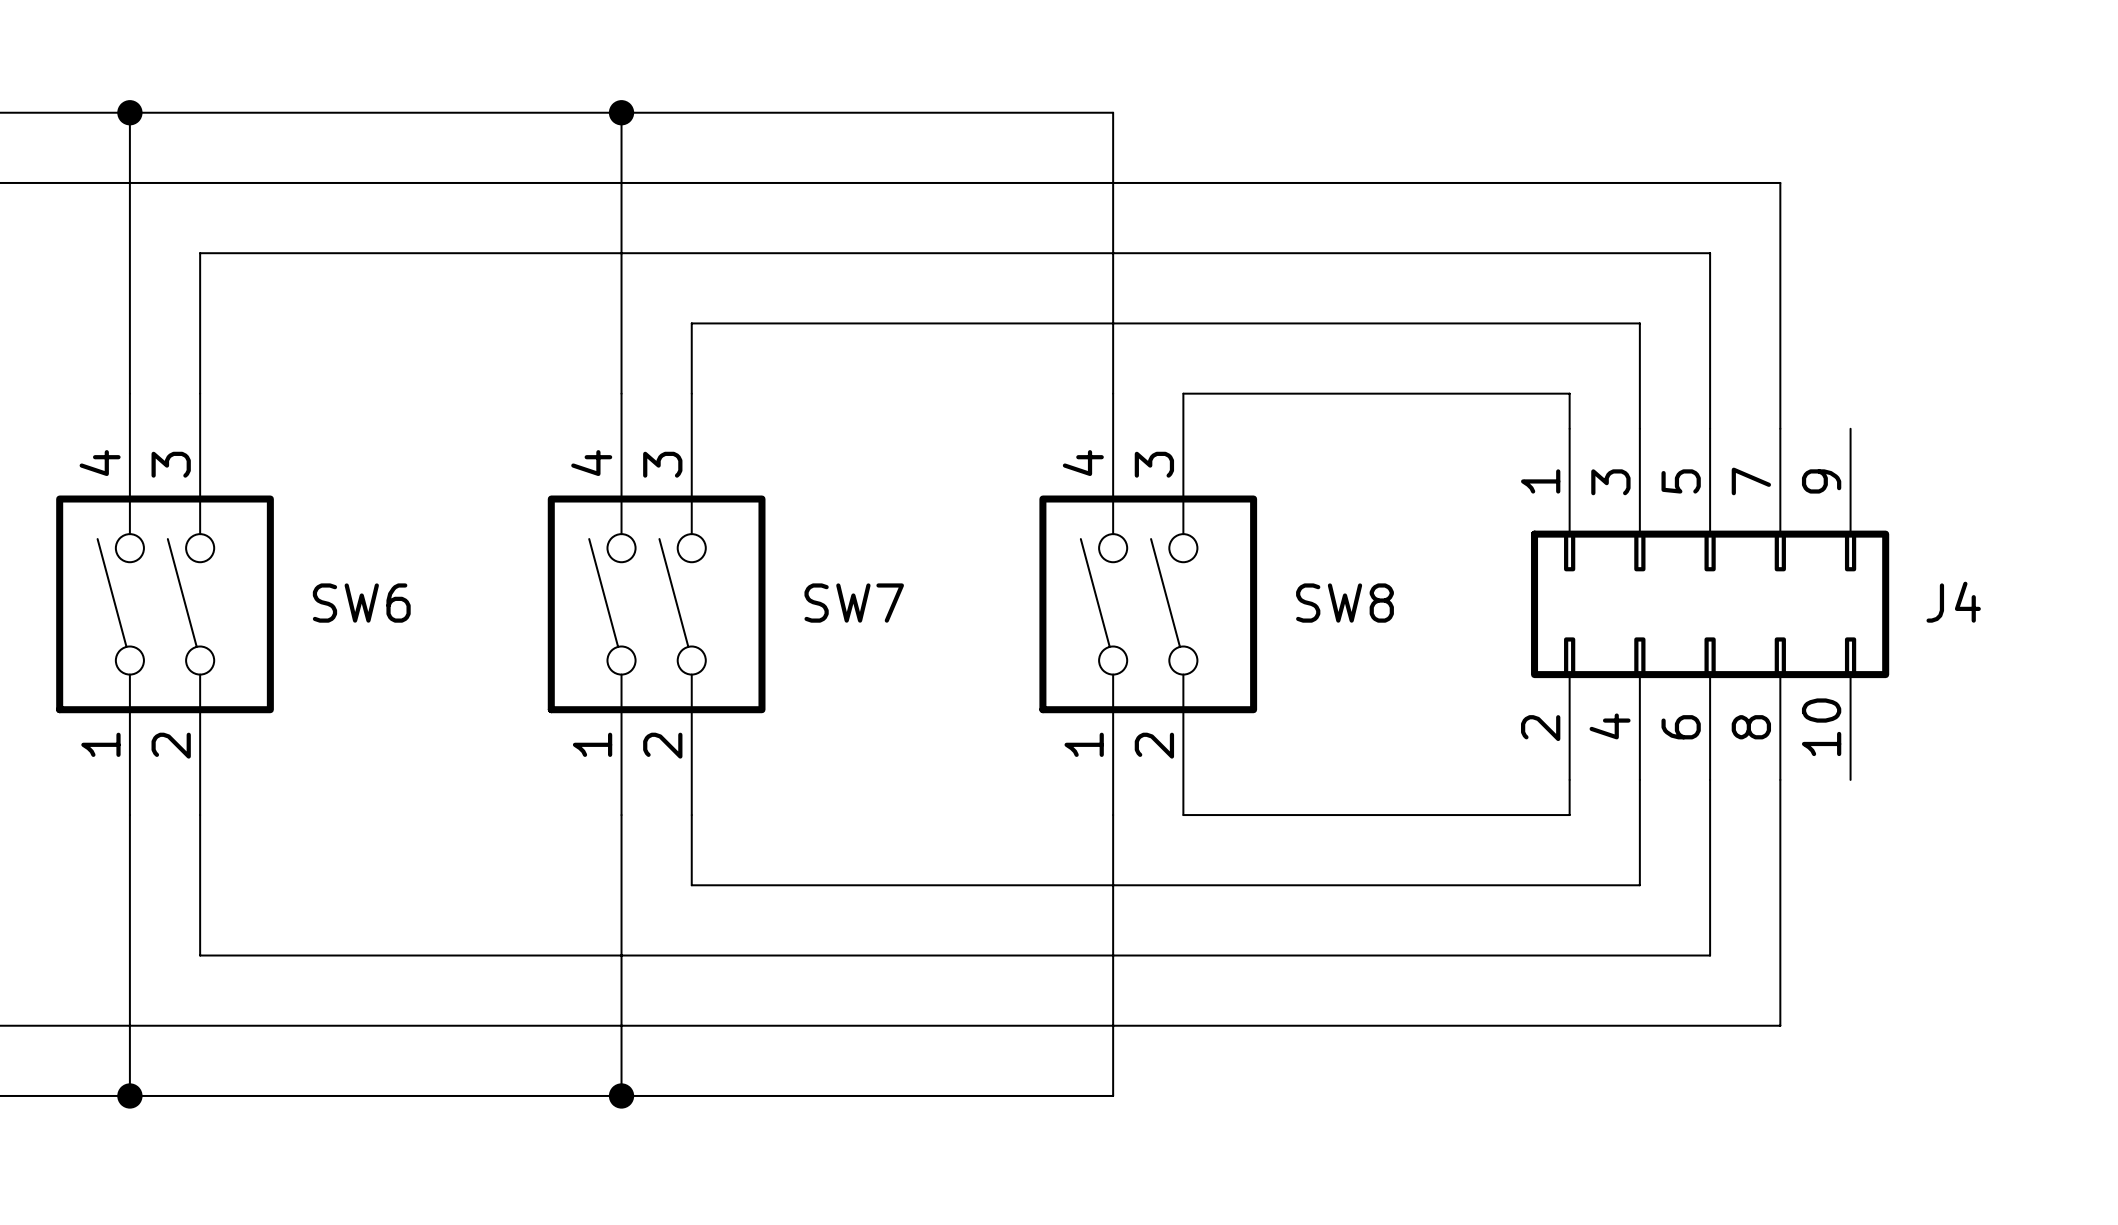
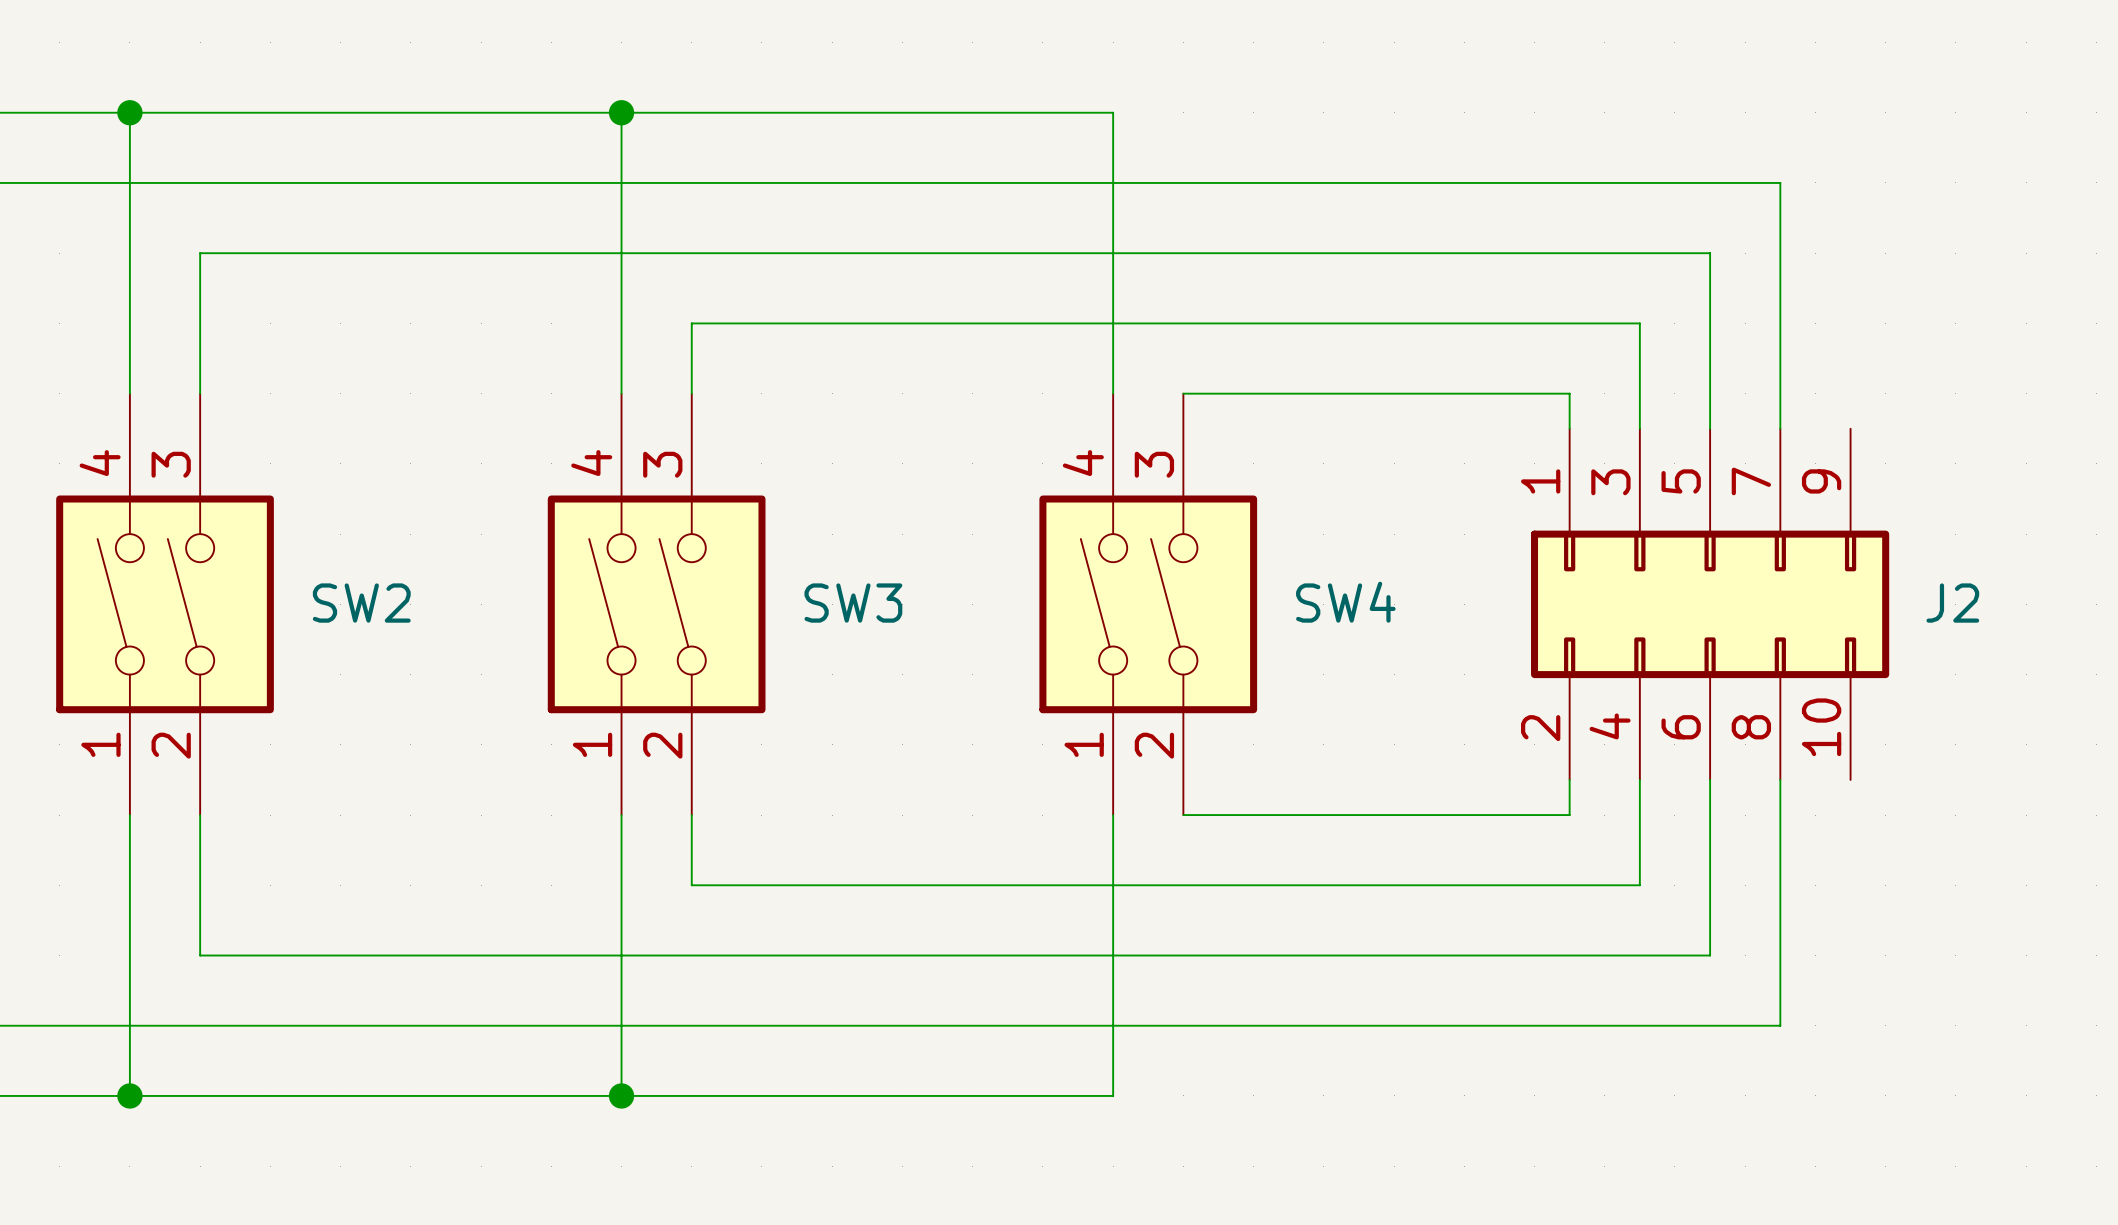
J4 name: J4 (1953, 602) -> J2 (1952, 603)
SW6 name: SW6 (361, 603) -> SW2 (361, 603)
SW7 name: SW7 (854, 603) -> SW3 (853, 603)
SW8 name: SW8 (1345, 603) -> SW4 (1345, 602)

